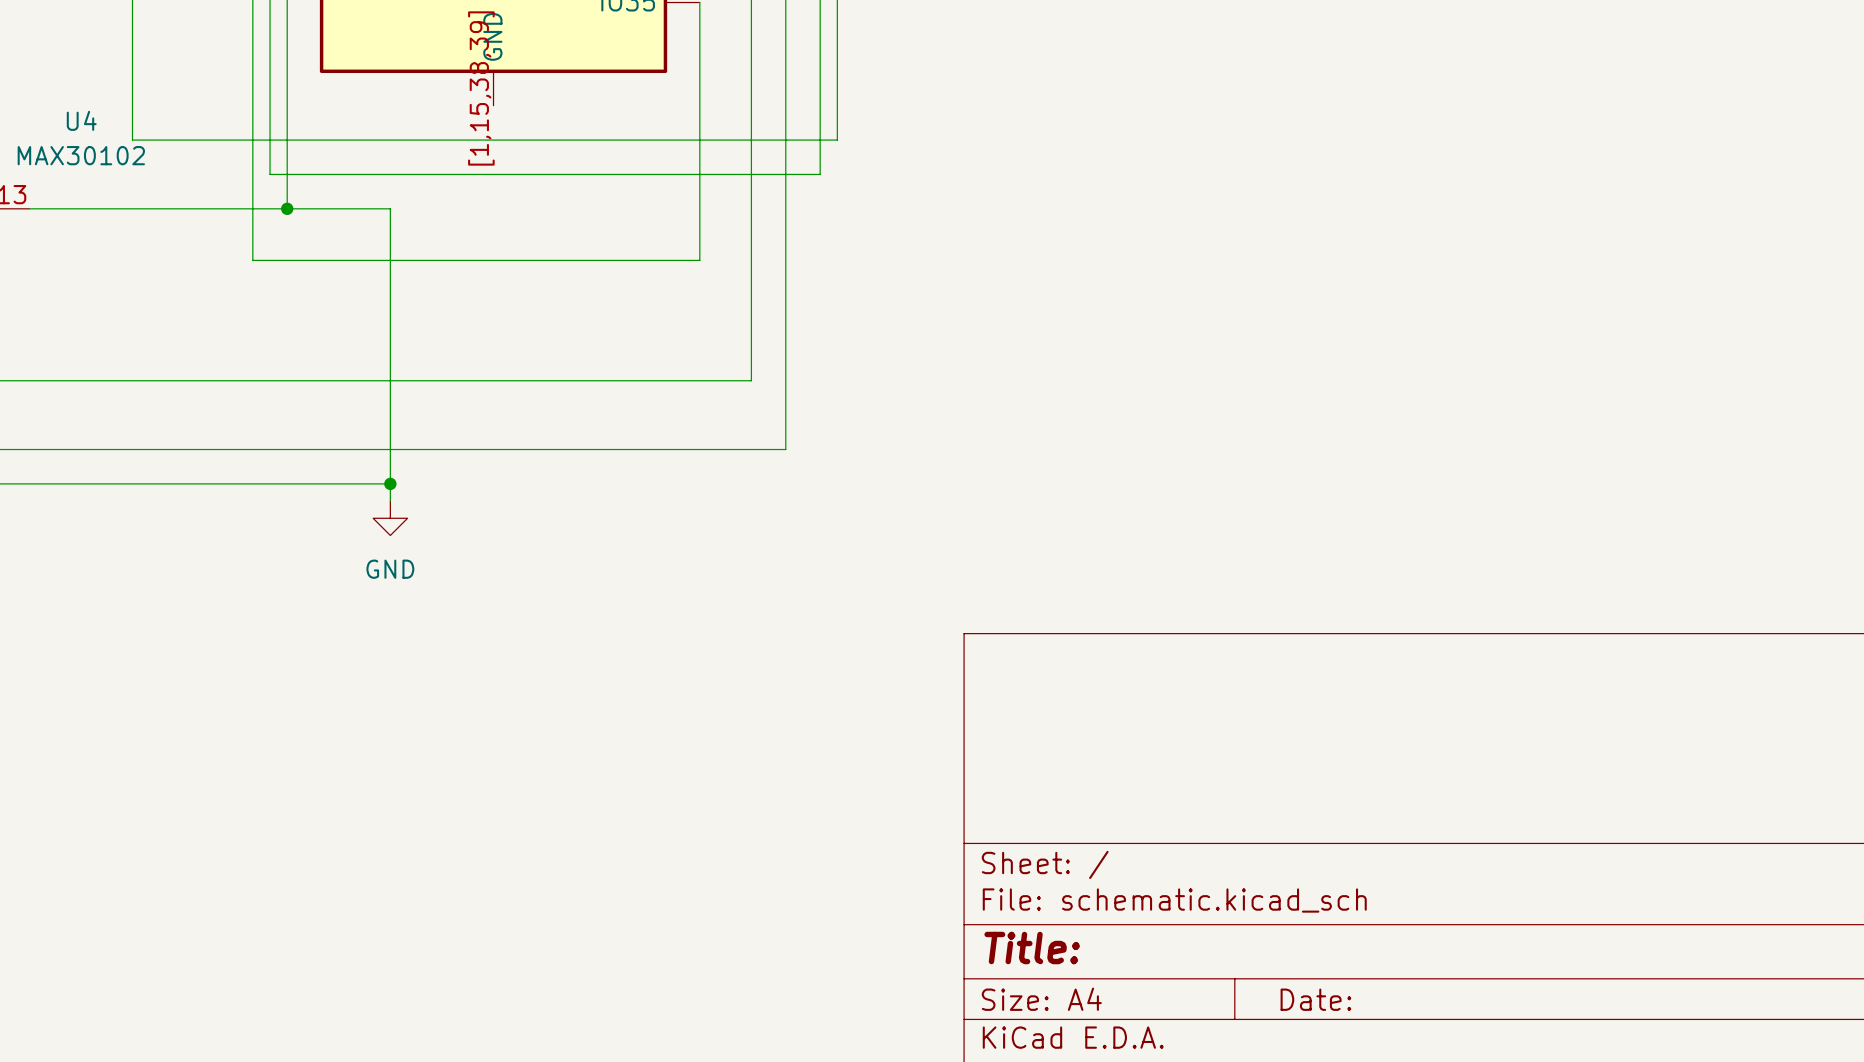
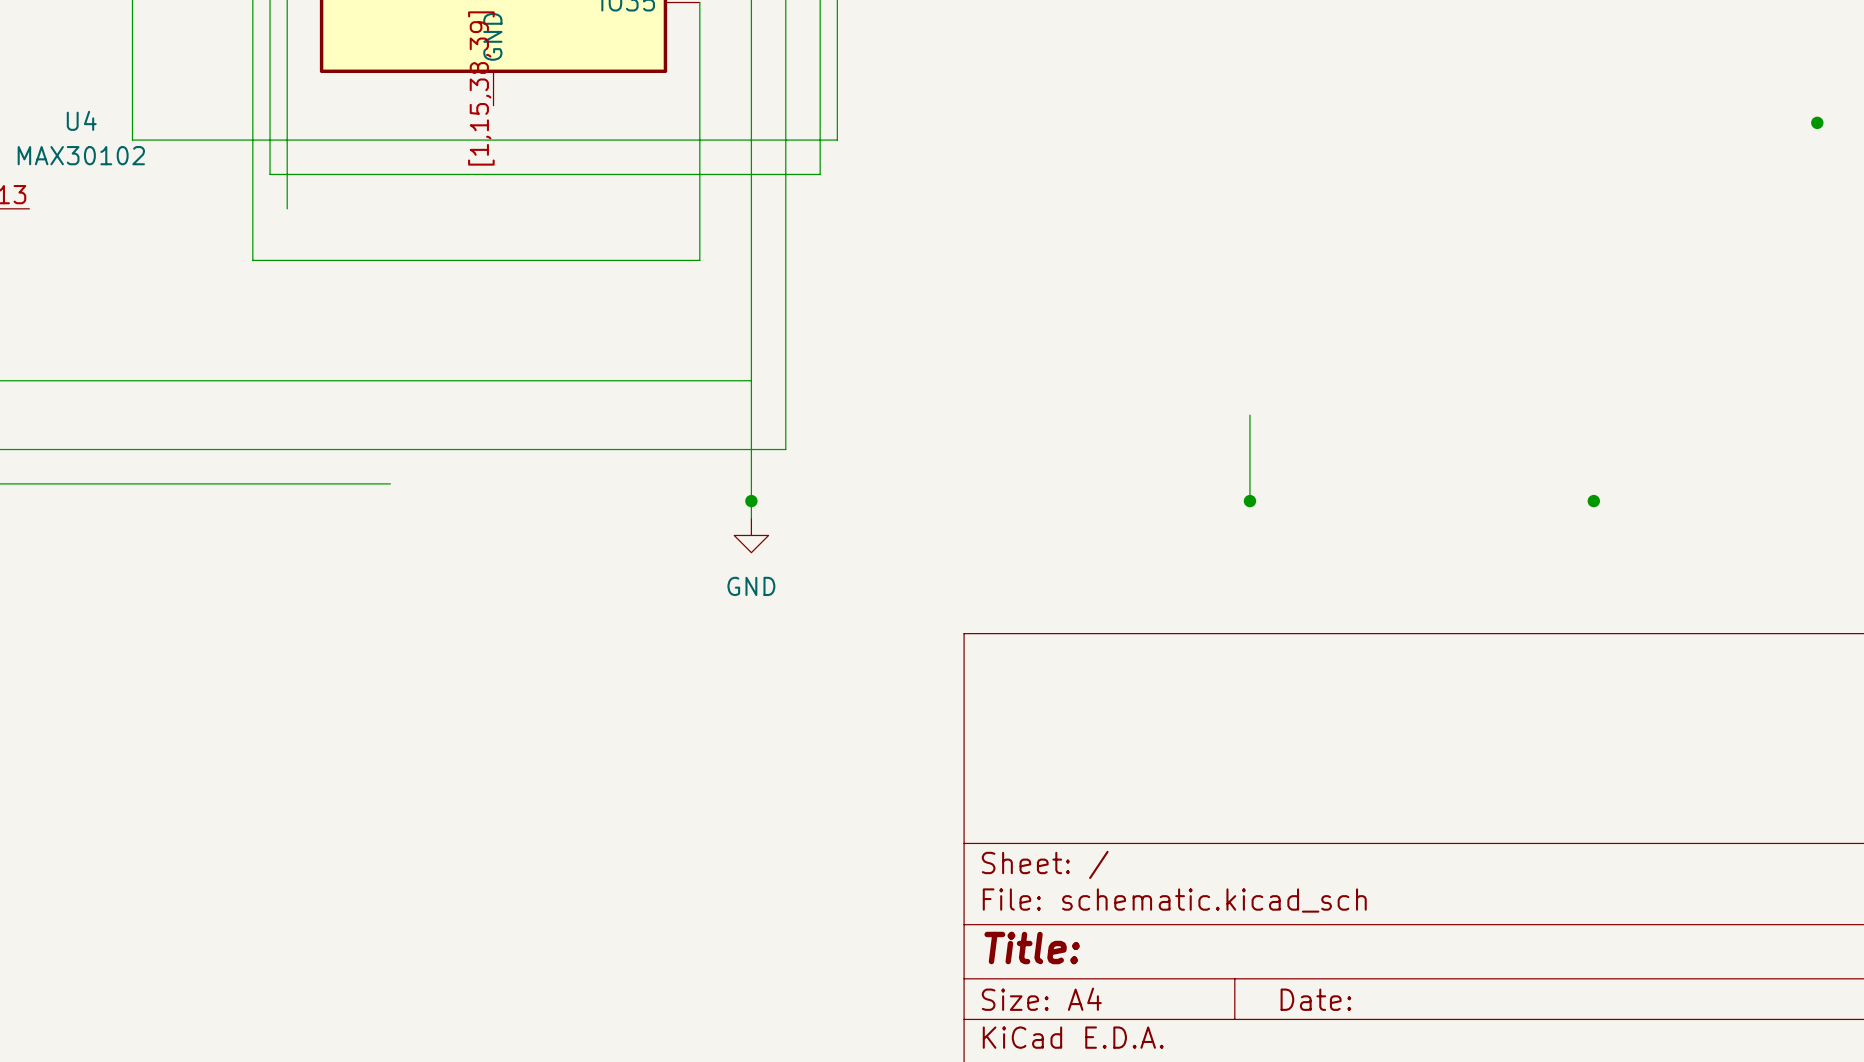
junction: none -> (1817, 122)
wire: (29, 208) (390, 208) (390, 501) -> none
junction: (287, 208) -> none
wire: none -> (751, 380) (751, 518)
wire: none -> (1249, 415) (1249, 501)
junction: (390, 483) -> none
junction: none -> (751, 501)
junction: none -> (1249, 501)
junction: none -> (1593, 501)
power symbol: GND (390, 518) -> none
power symbol: none -> GND (751, 535)

